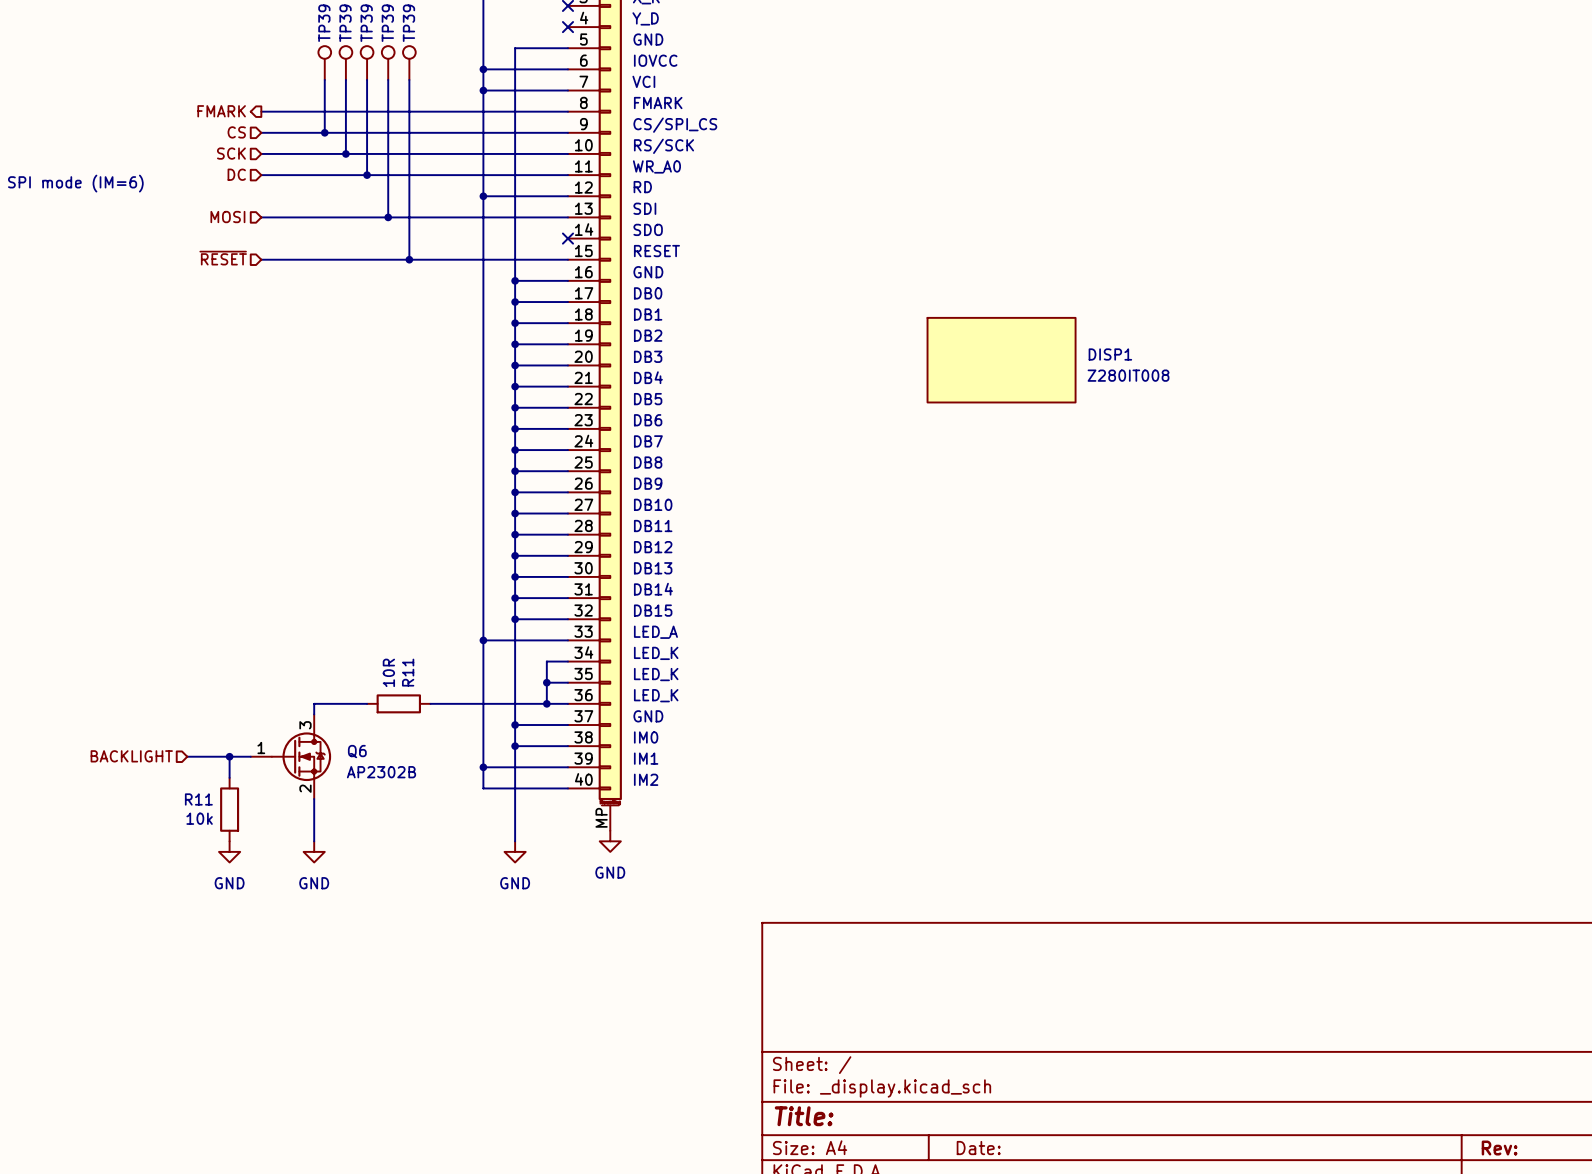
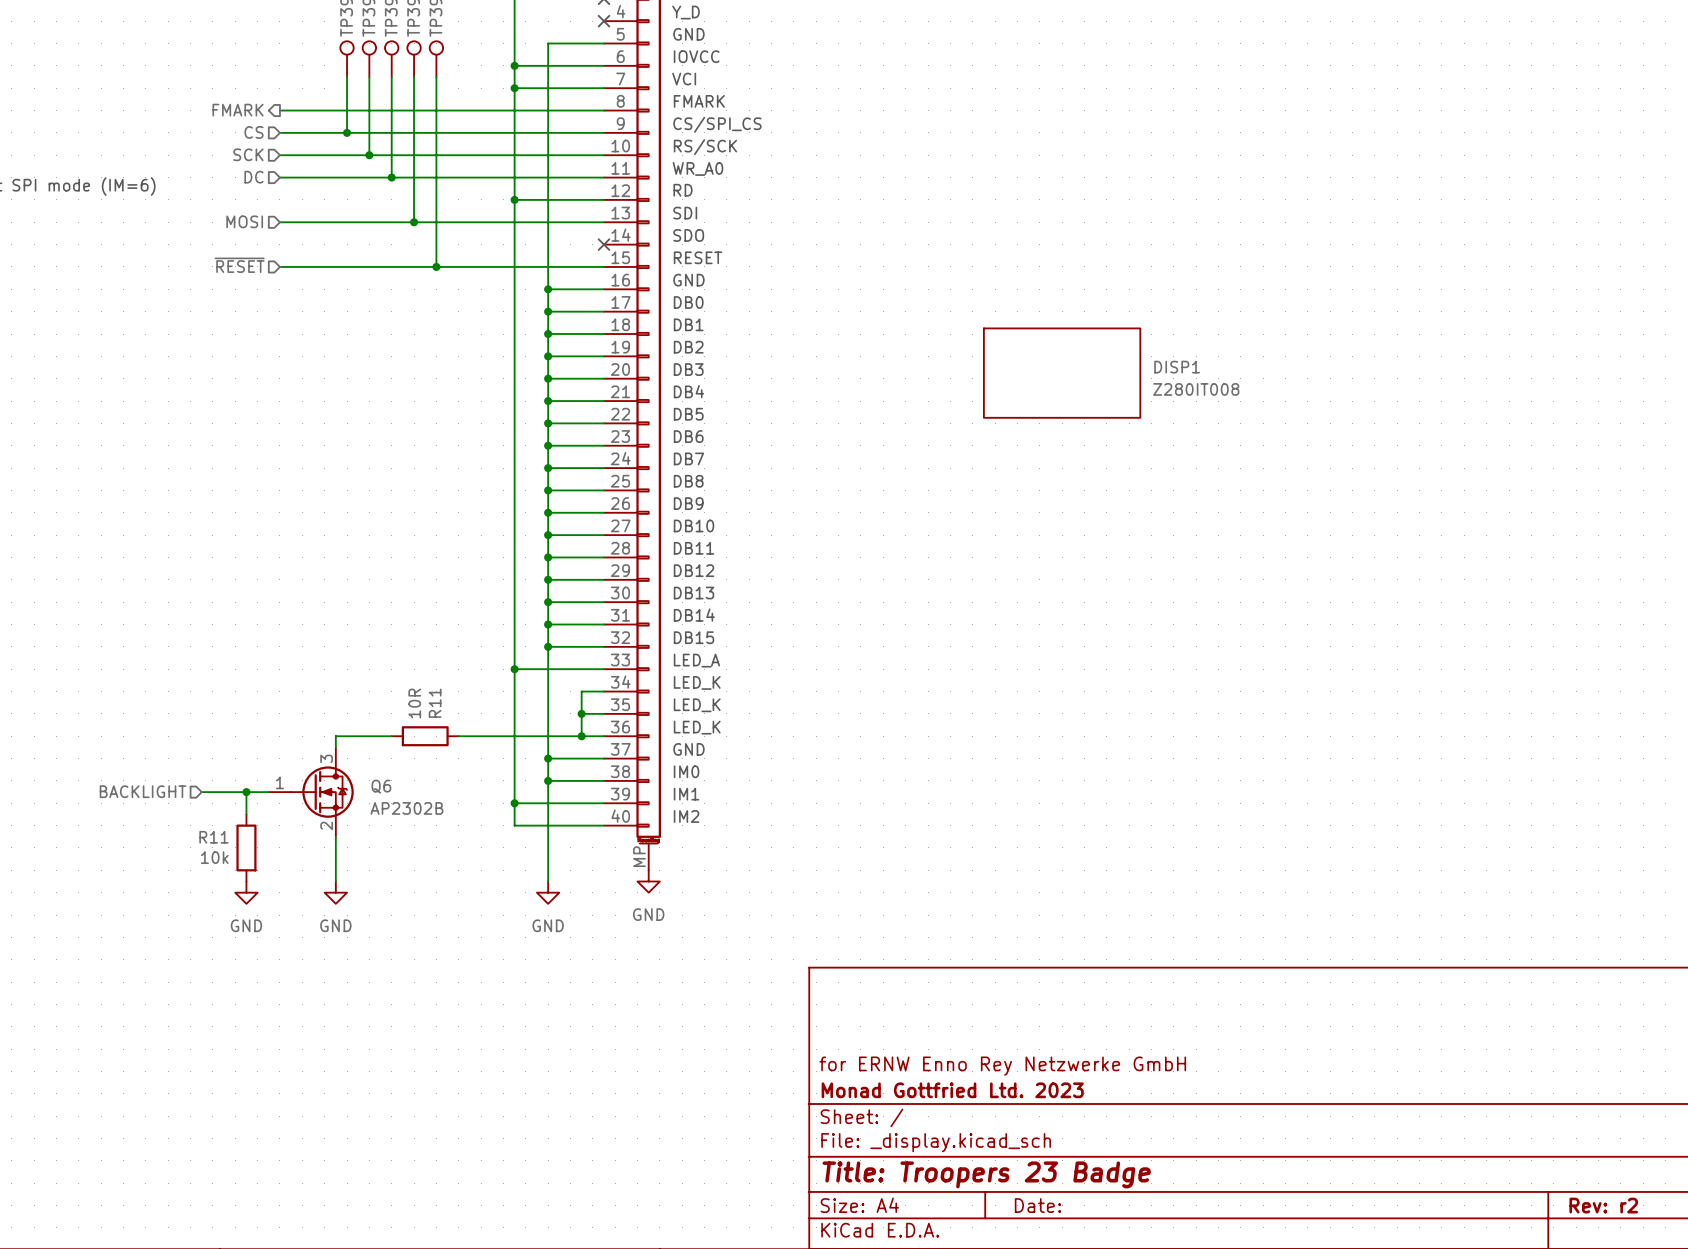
title block: none -> for ERNW Enno Rey Netzwerke GmbH (1002, 1066)
title block: none -> Monad Gottfried Ltd. 2023 (952, 1090)
title block: Title: (804, 1116) -> Title: Troopers 23 Badge (986, 1174)
title block: Rev: (1499, 1148) -> Rev: r2 (1603, 1205)

